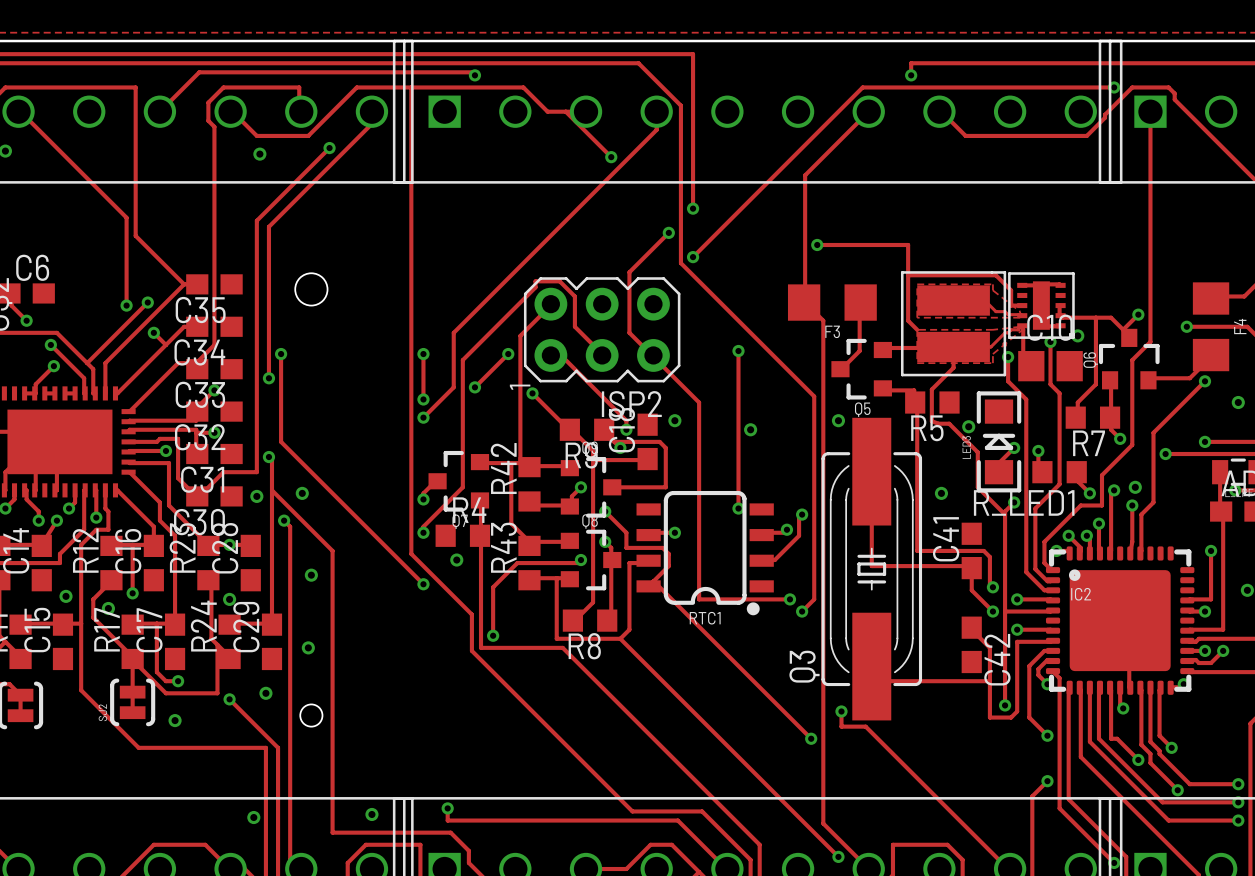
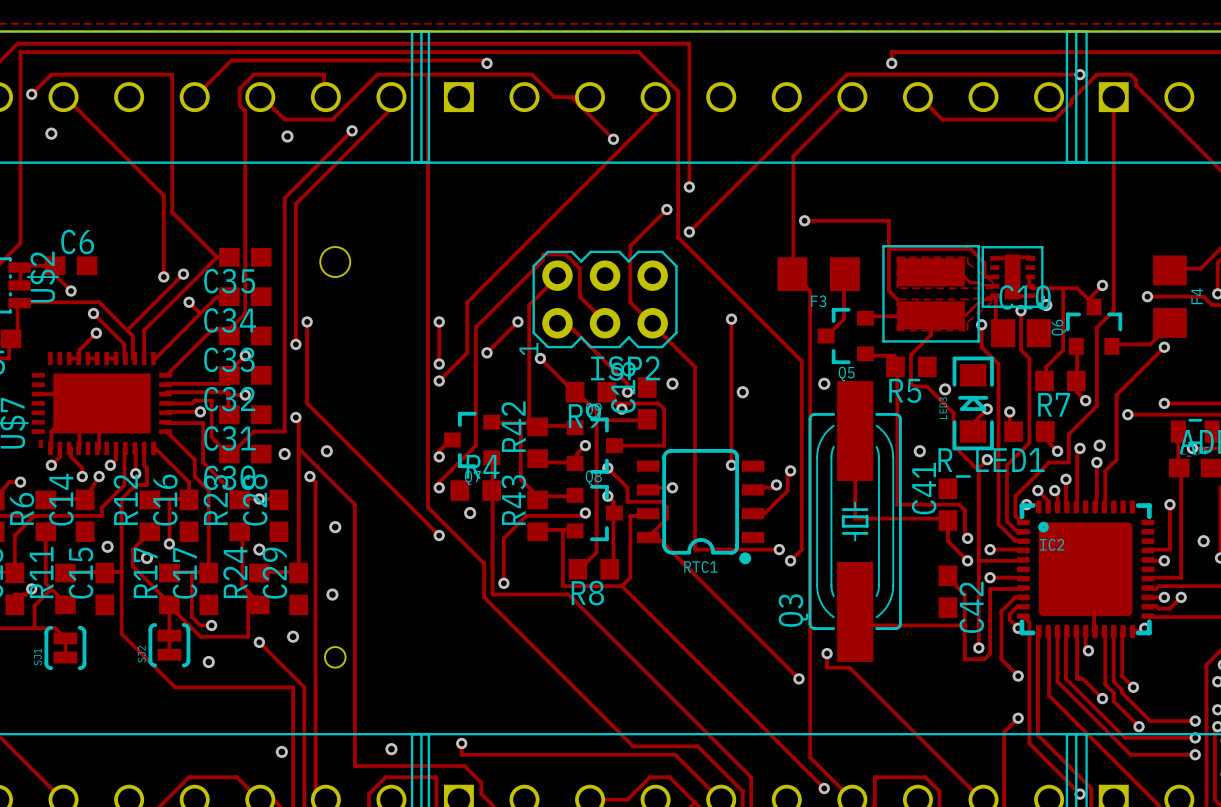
via: (1238, 402) -> none

